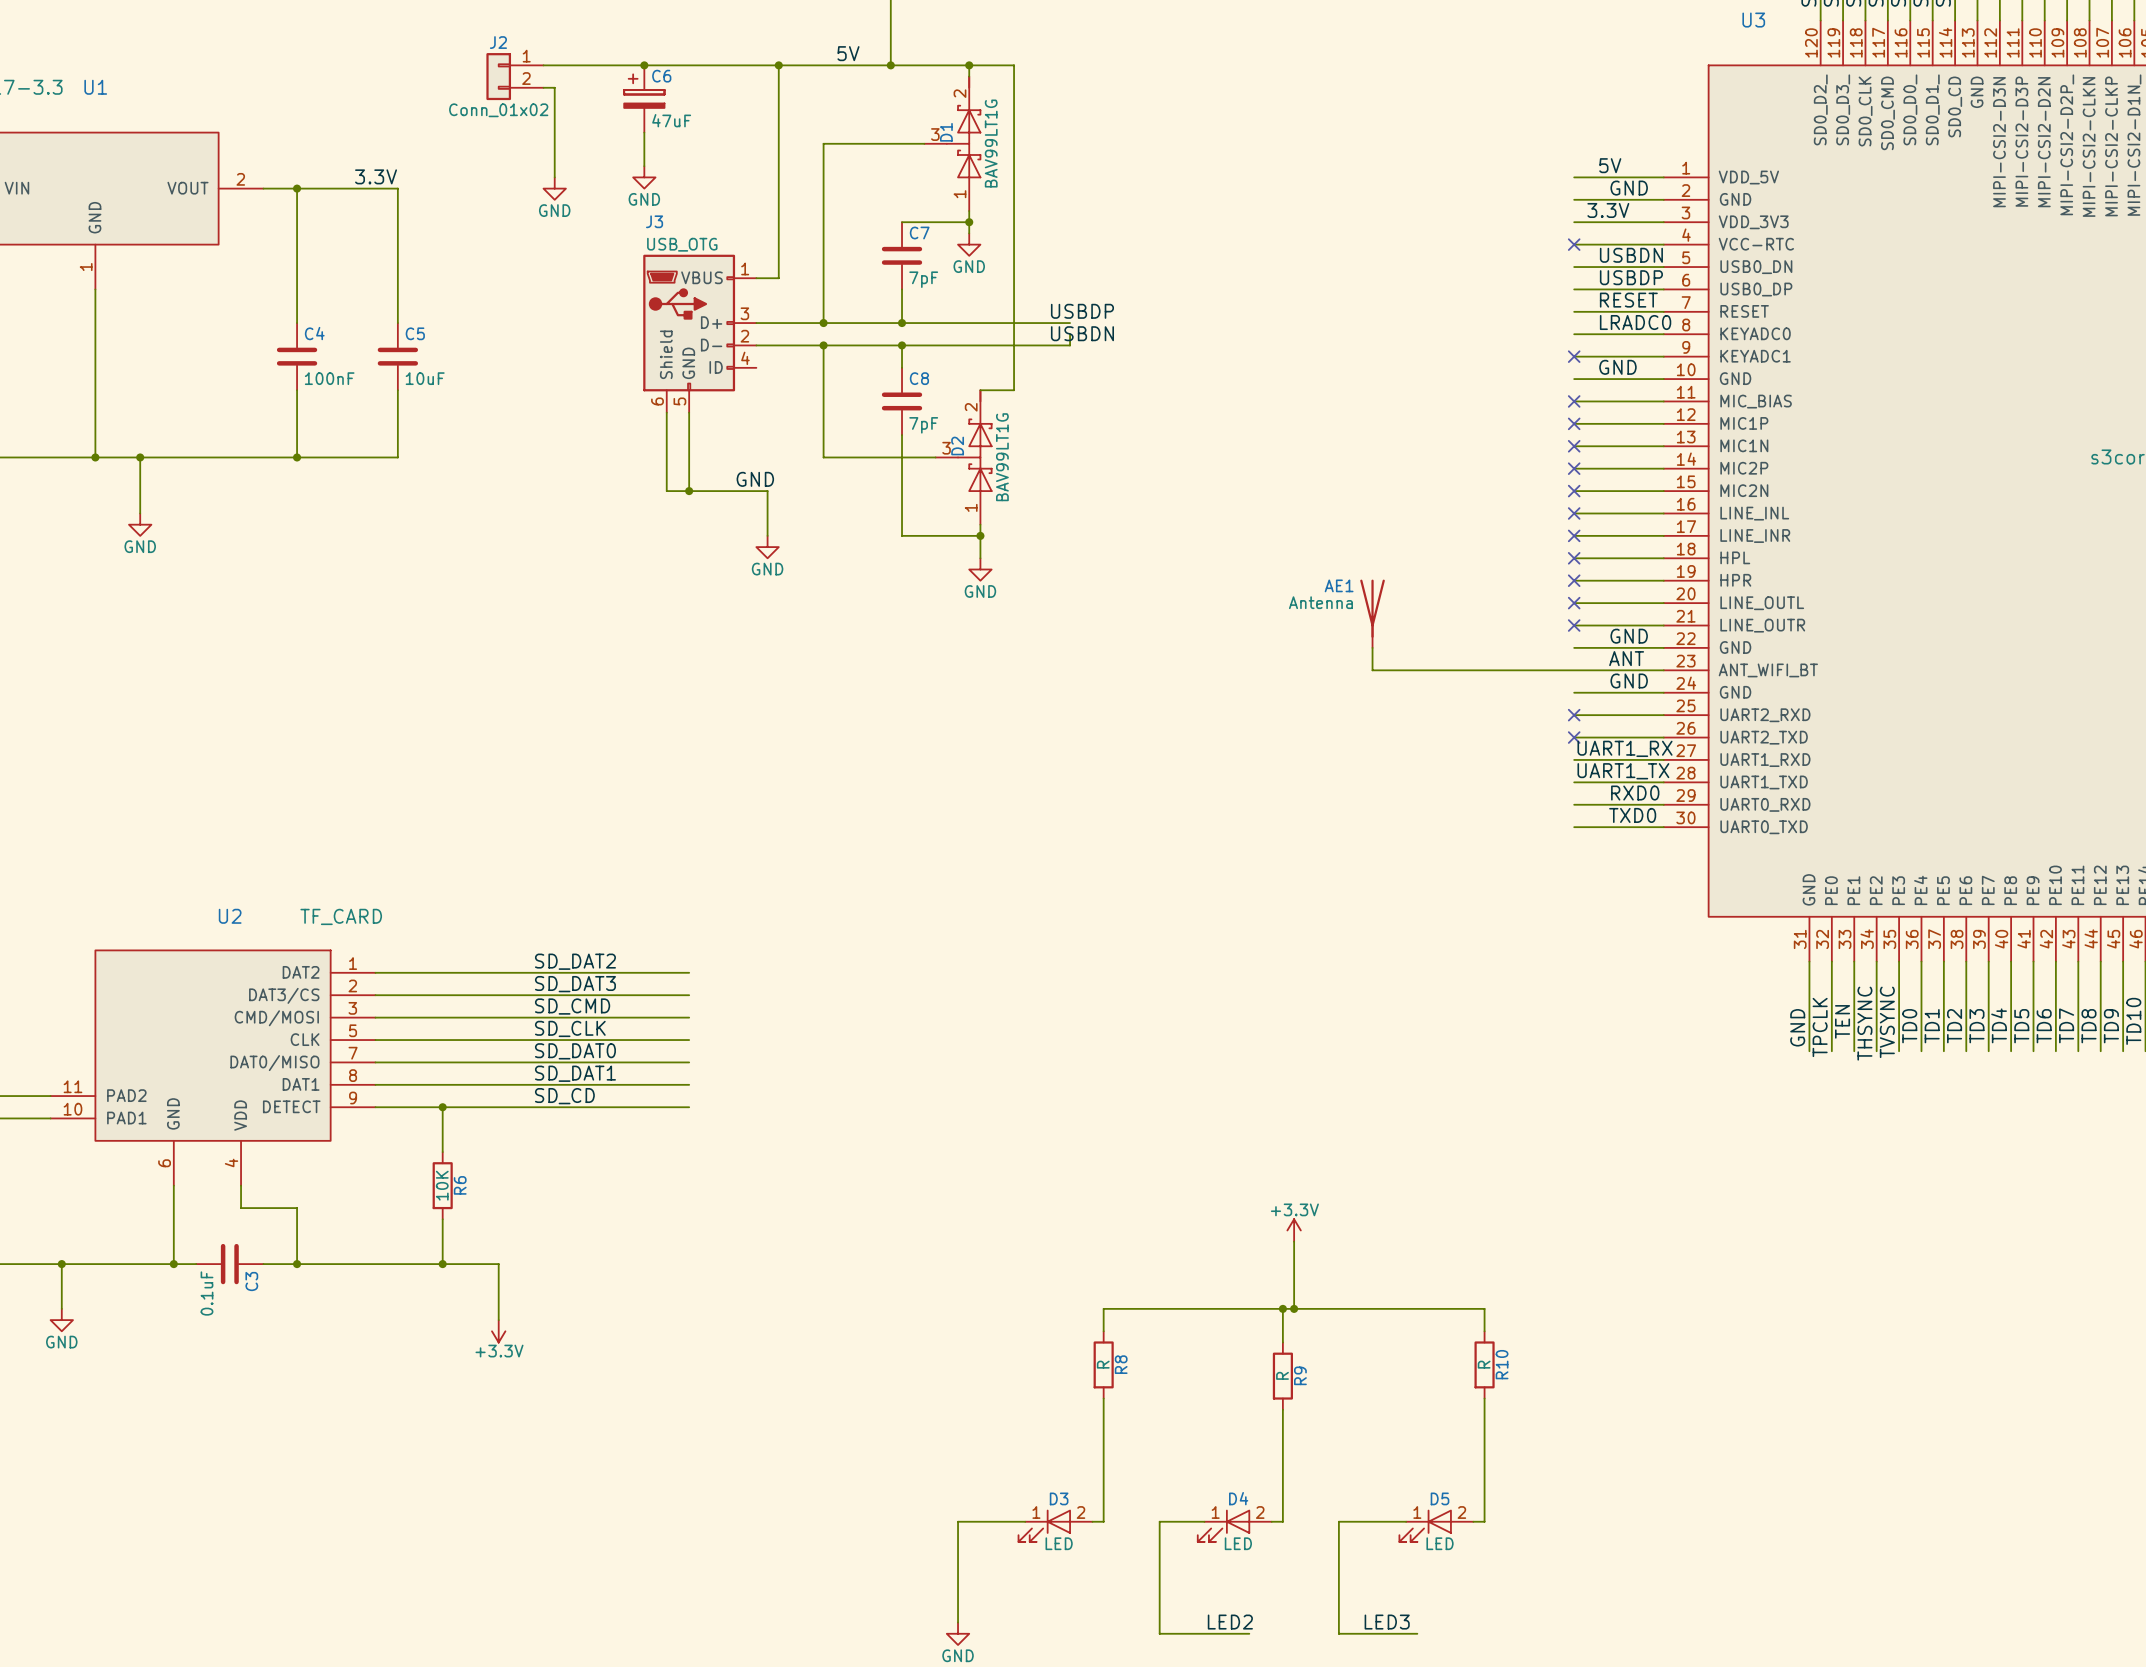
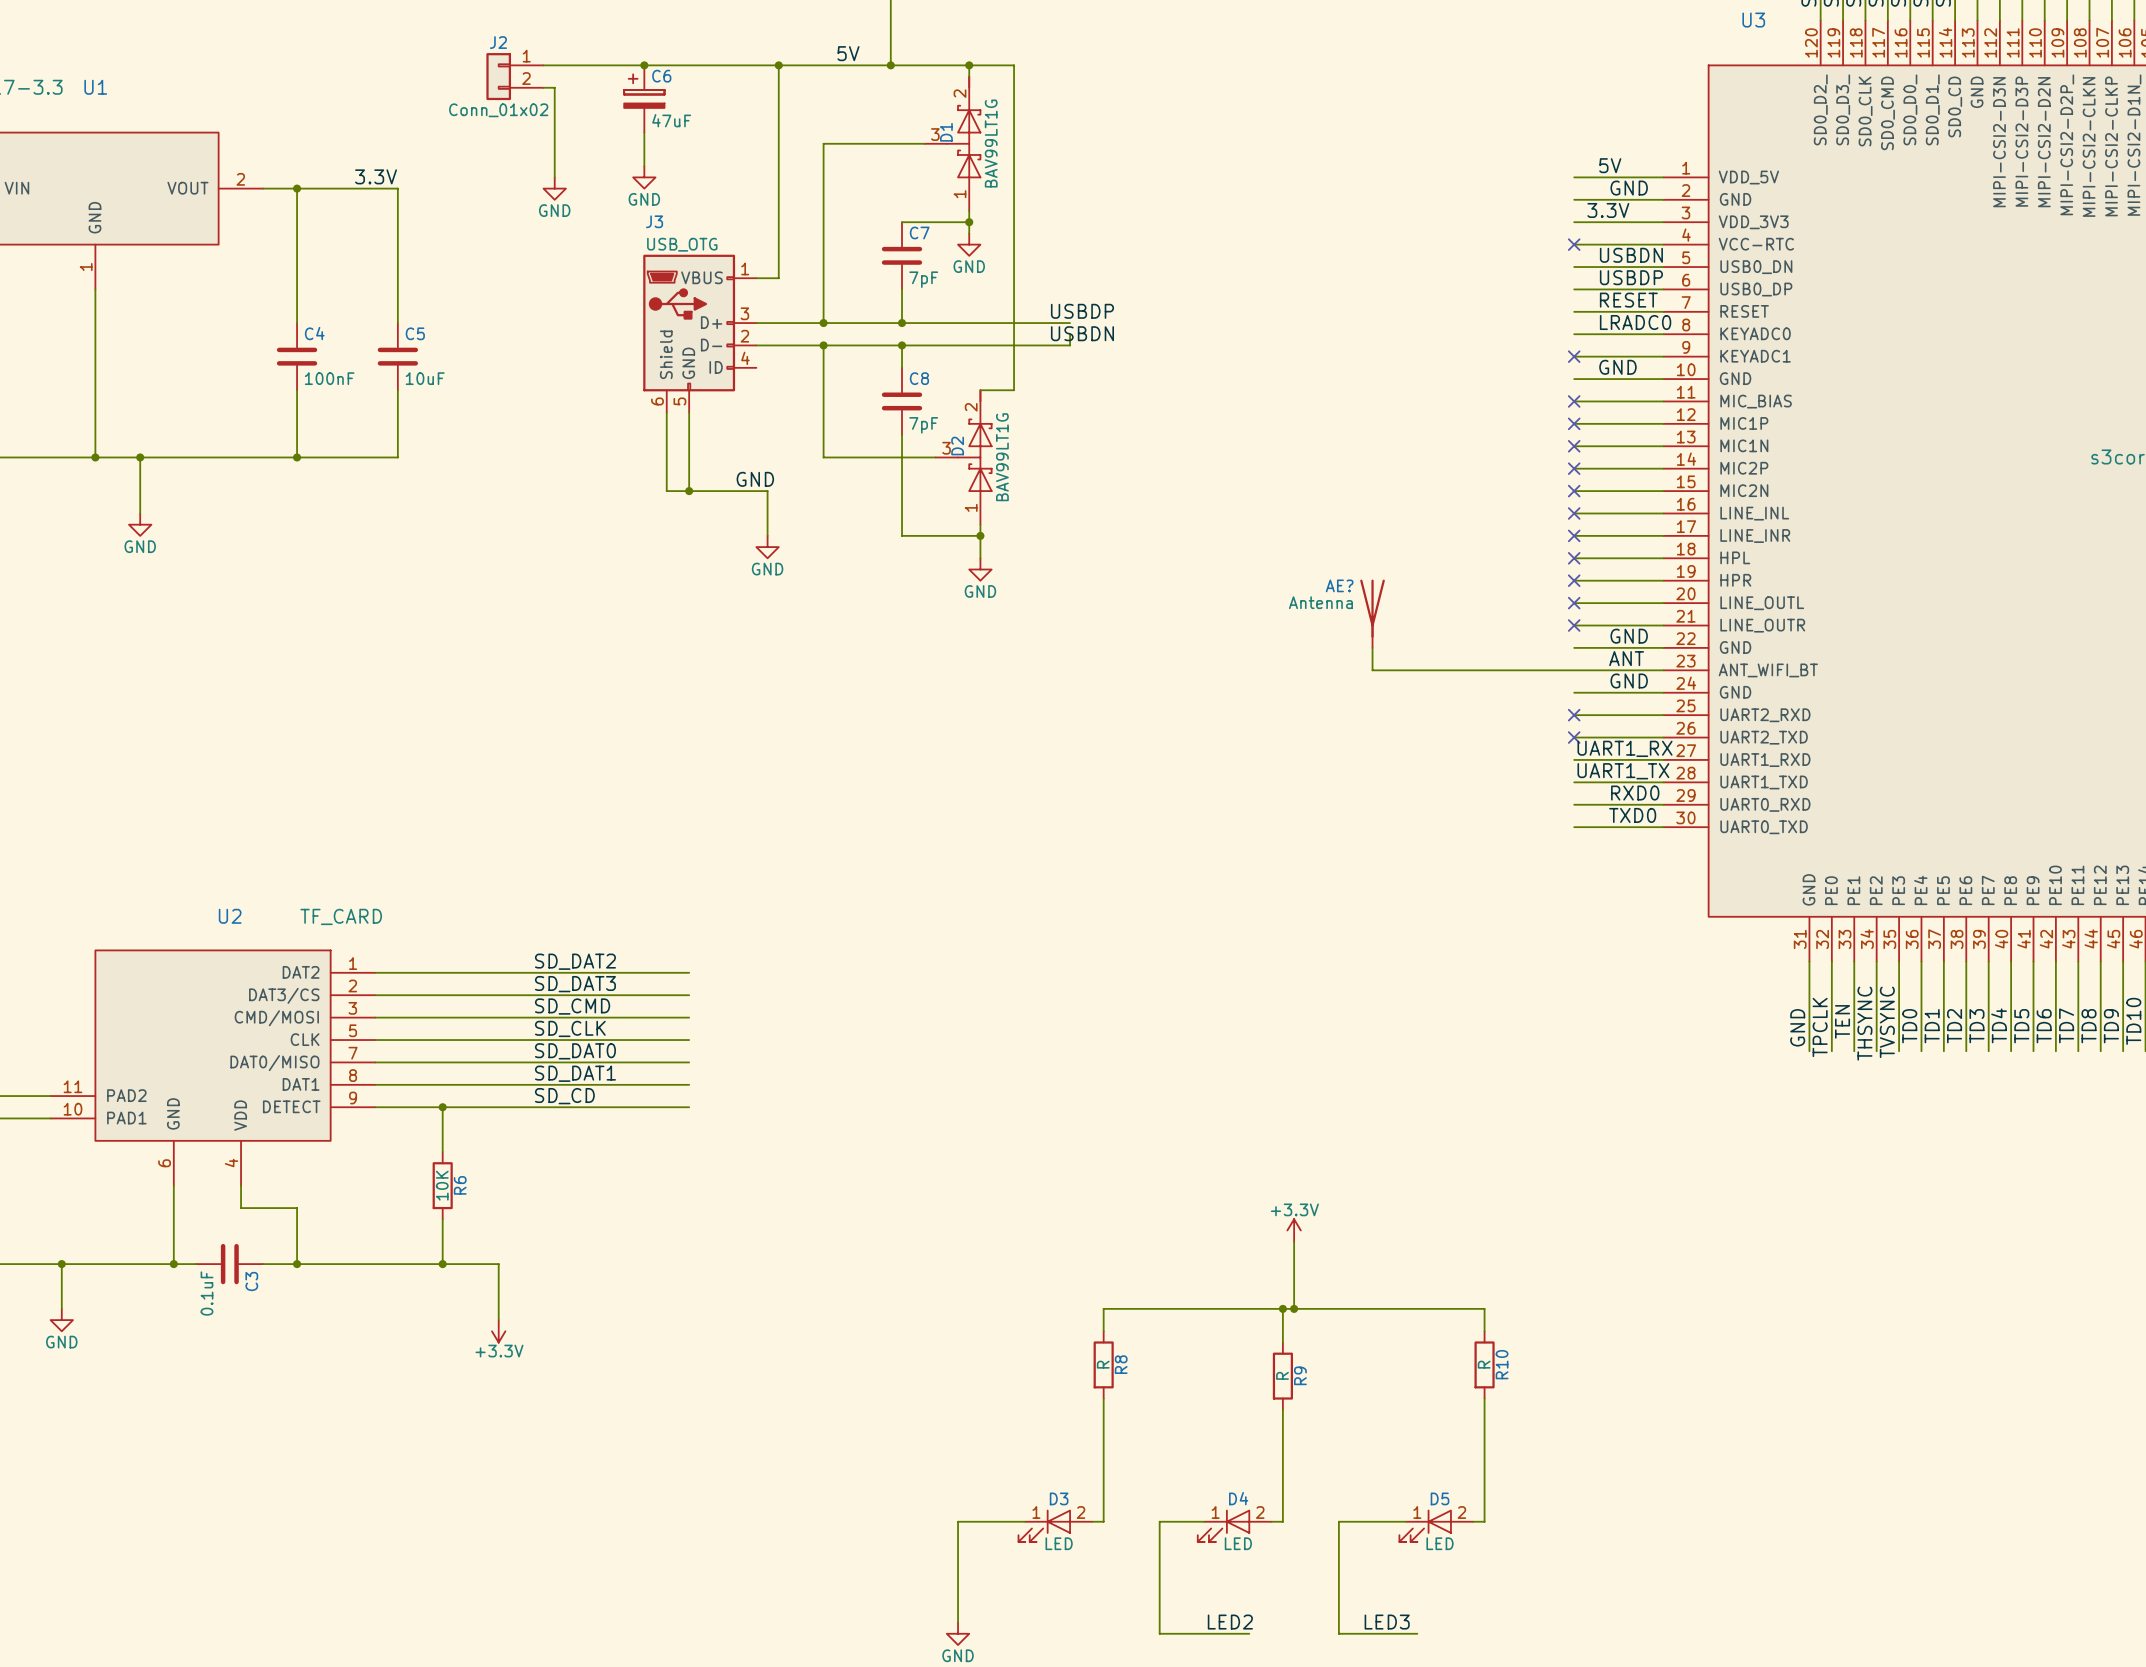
AE1 name: AE1 (1339, 585) -> AE? (1339, 585)

